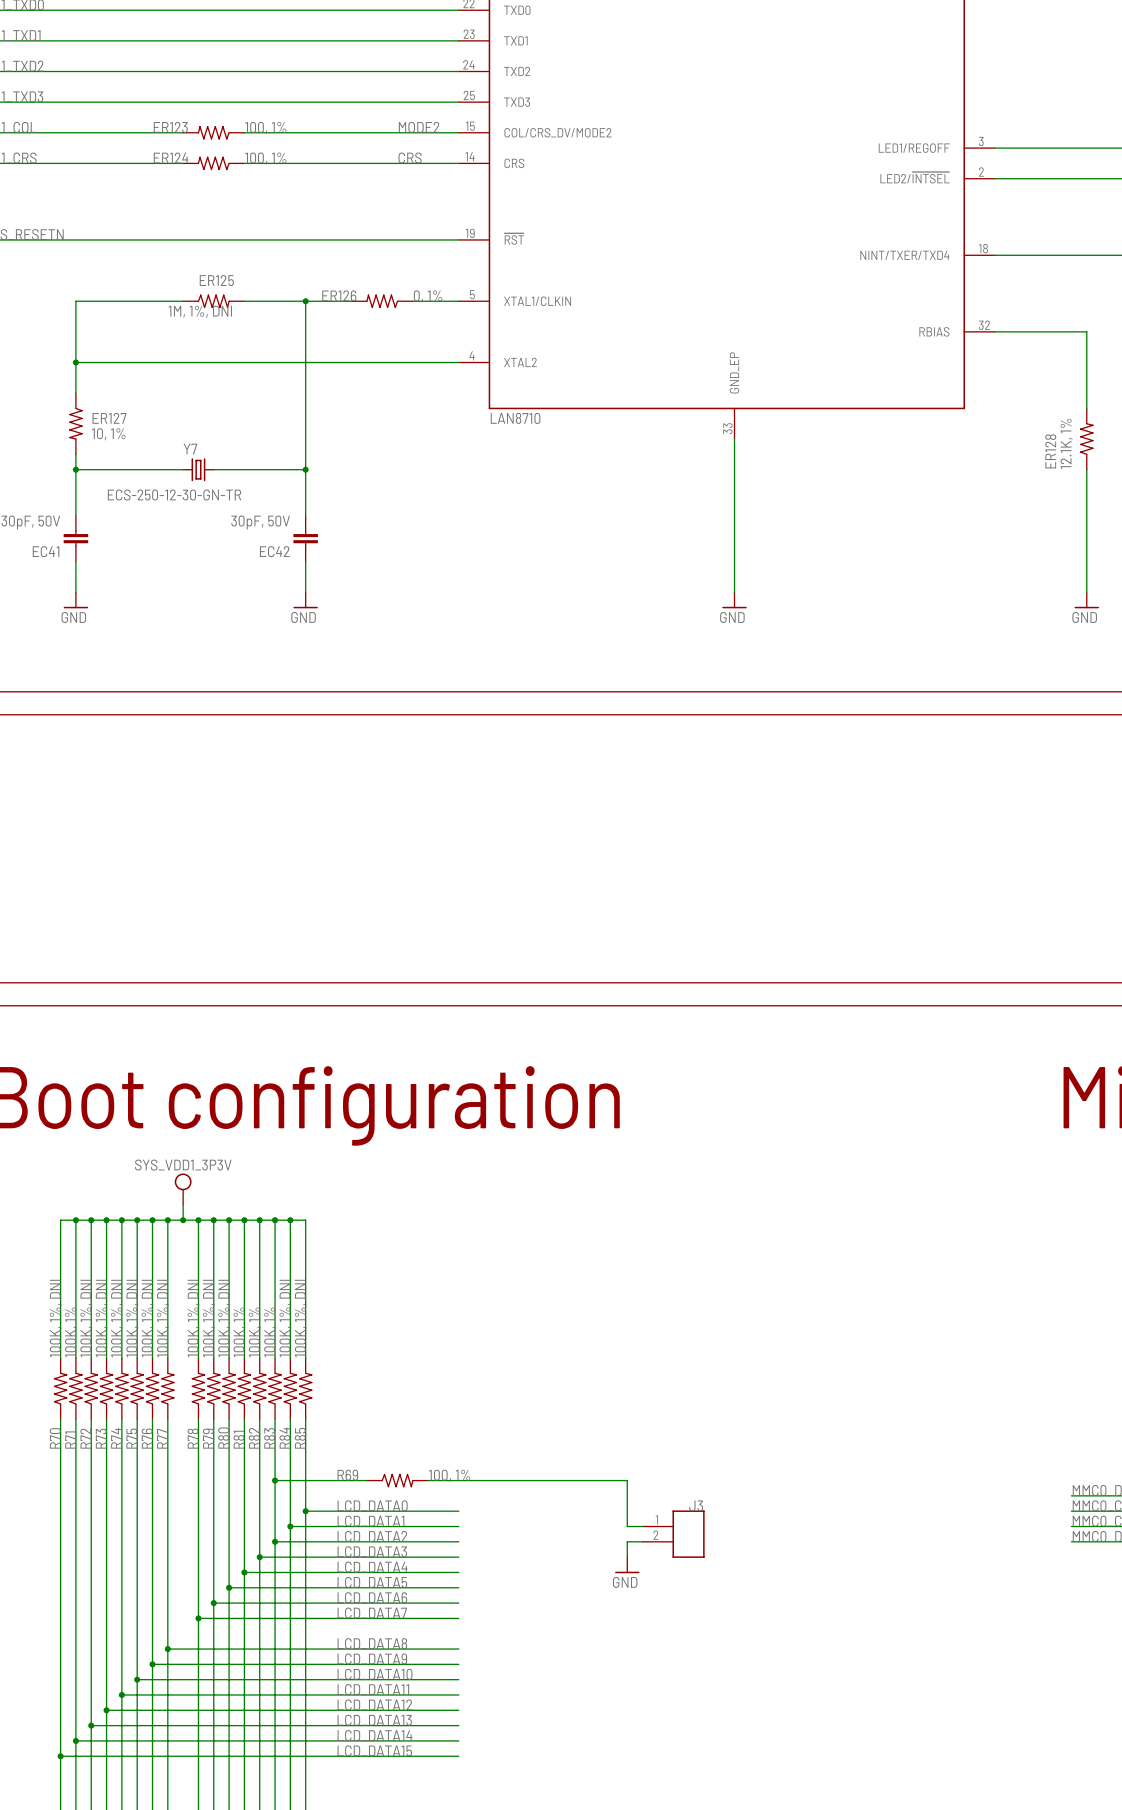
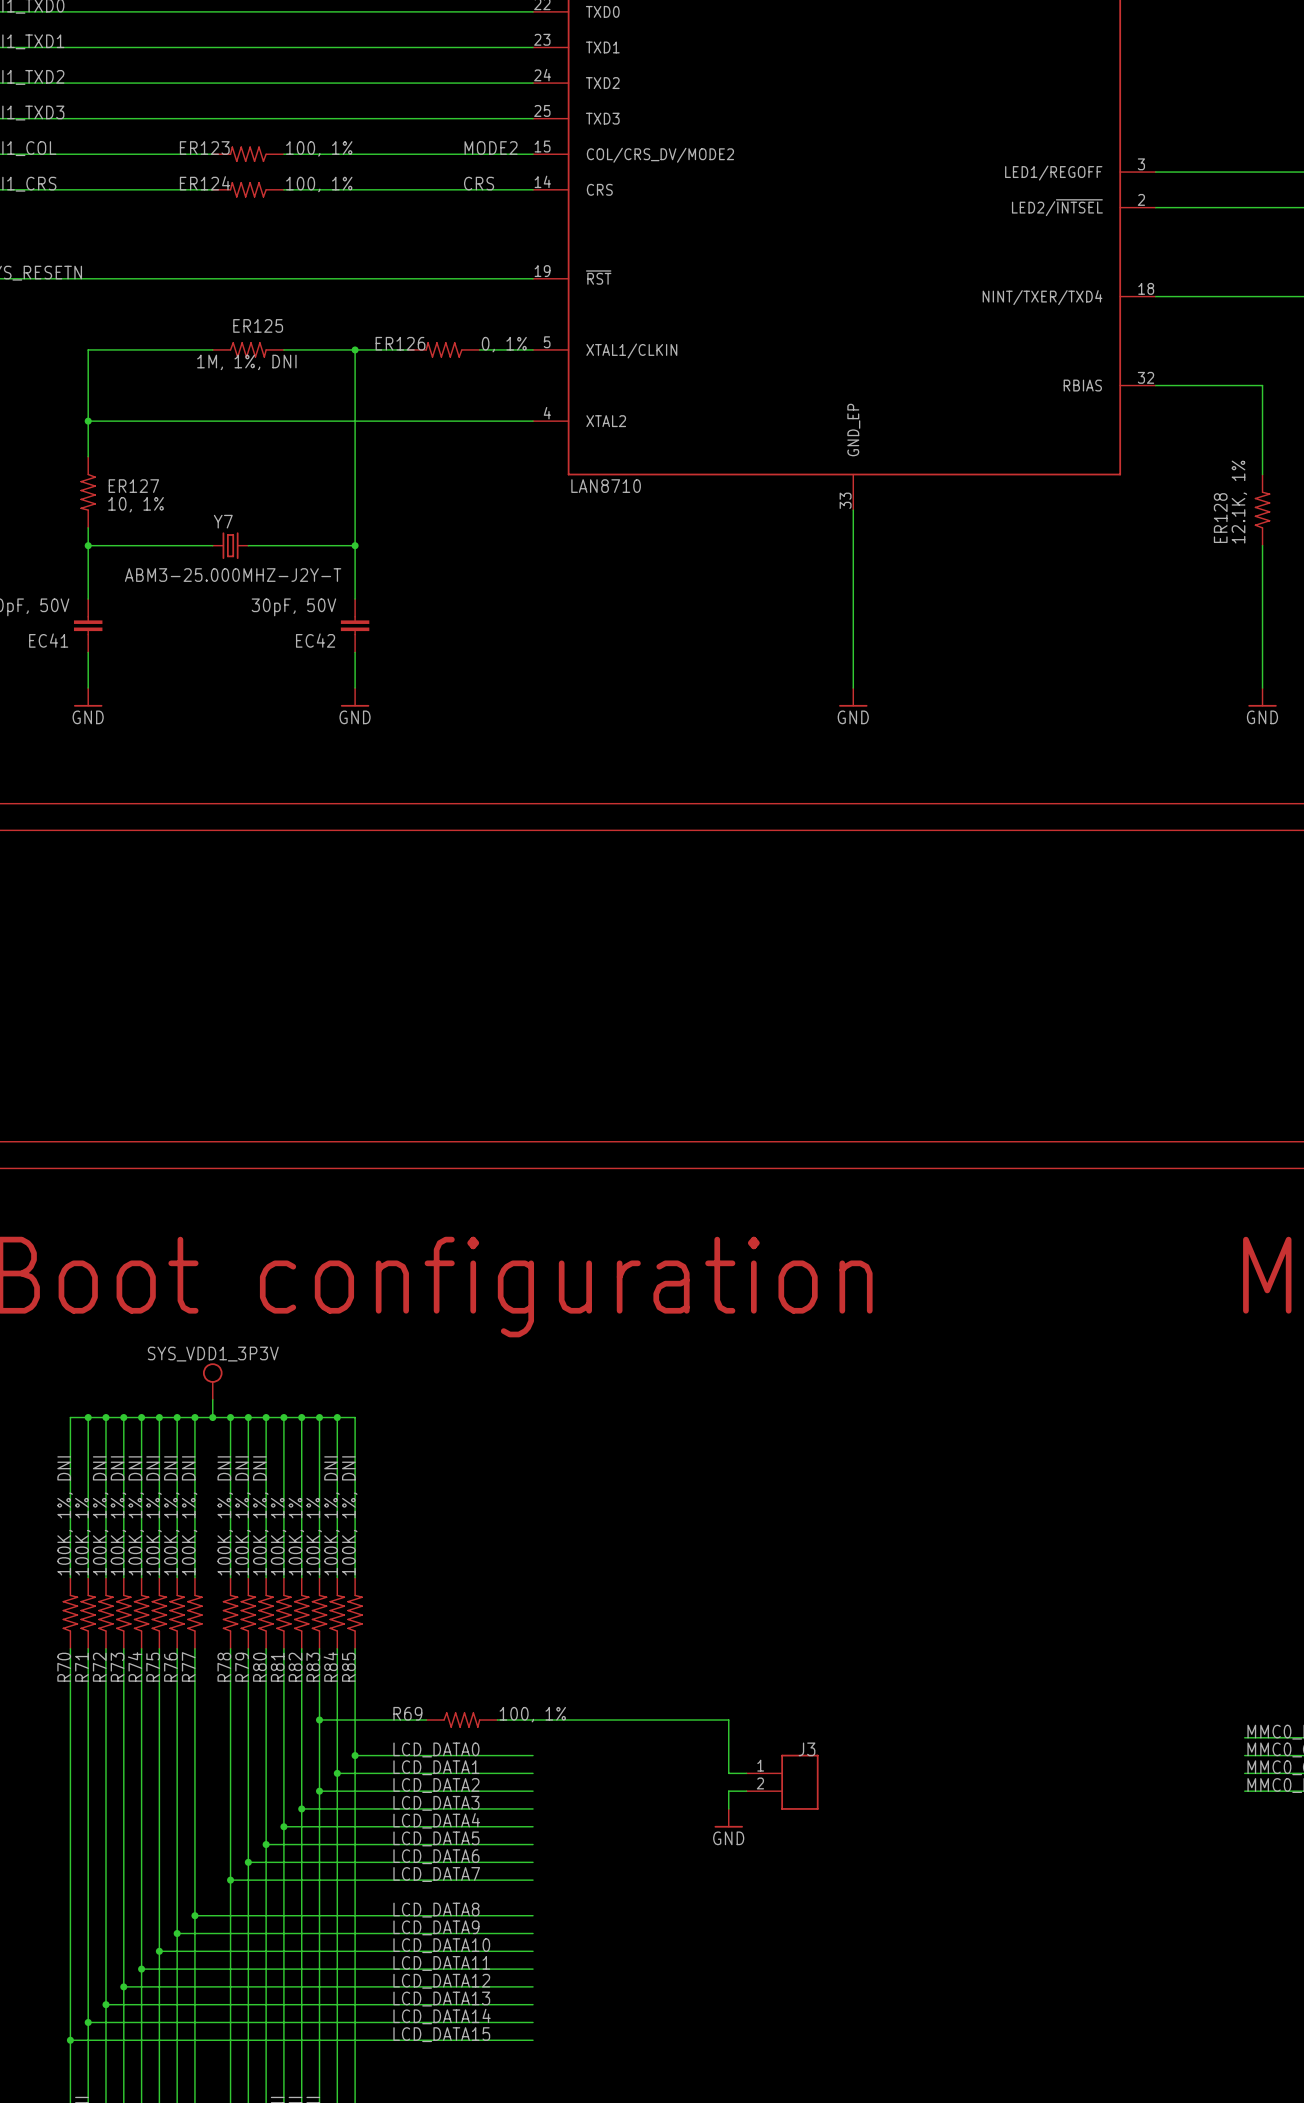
Y7 value: ECS-250-12-30-GN-TR (174, 494) -> ABM3-25.000MHZ-J2Y-T (233, 575)

